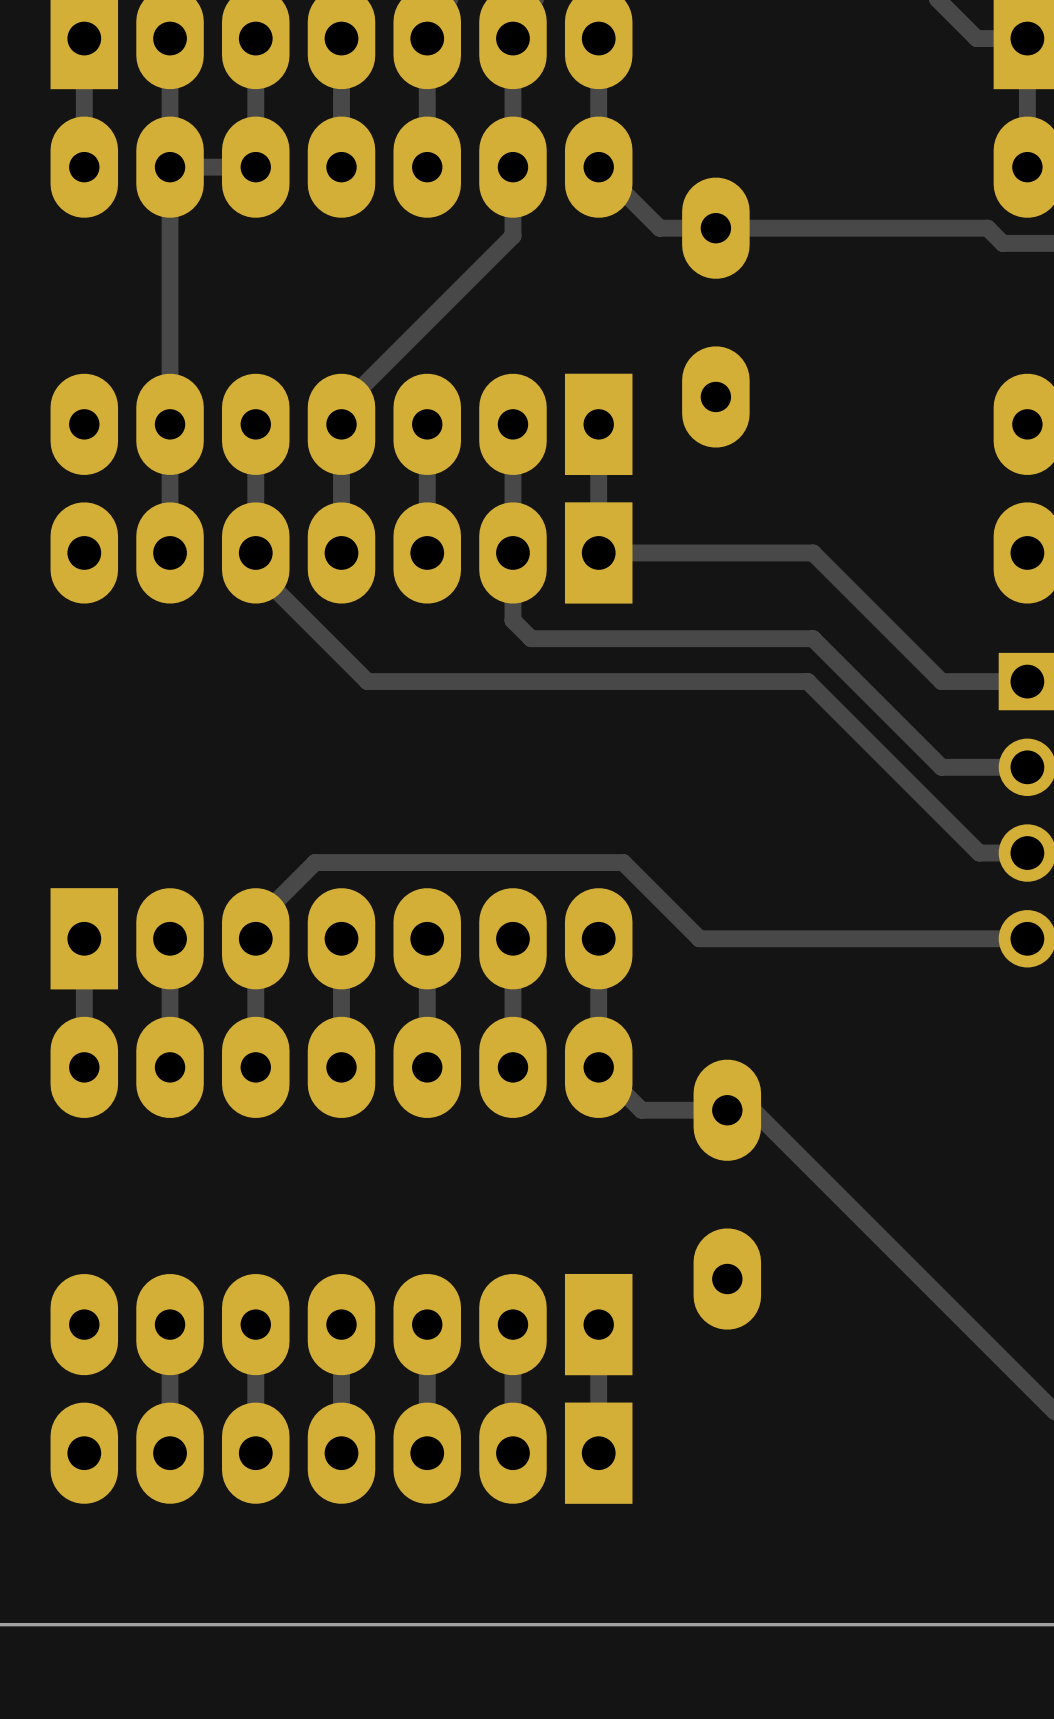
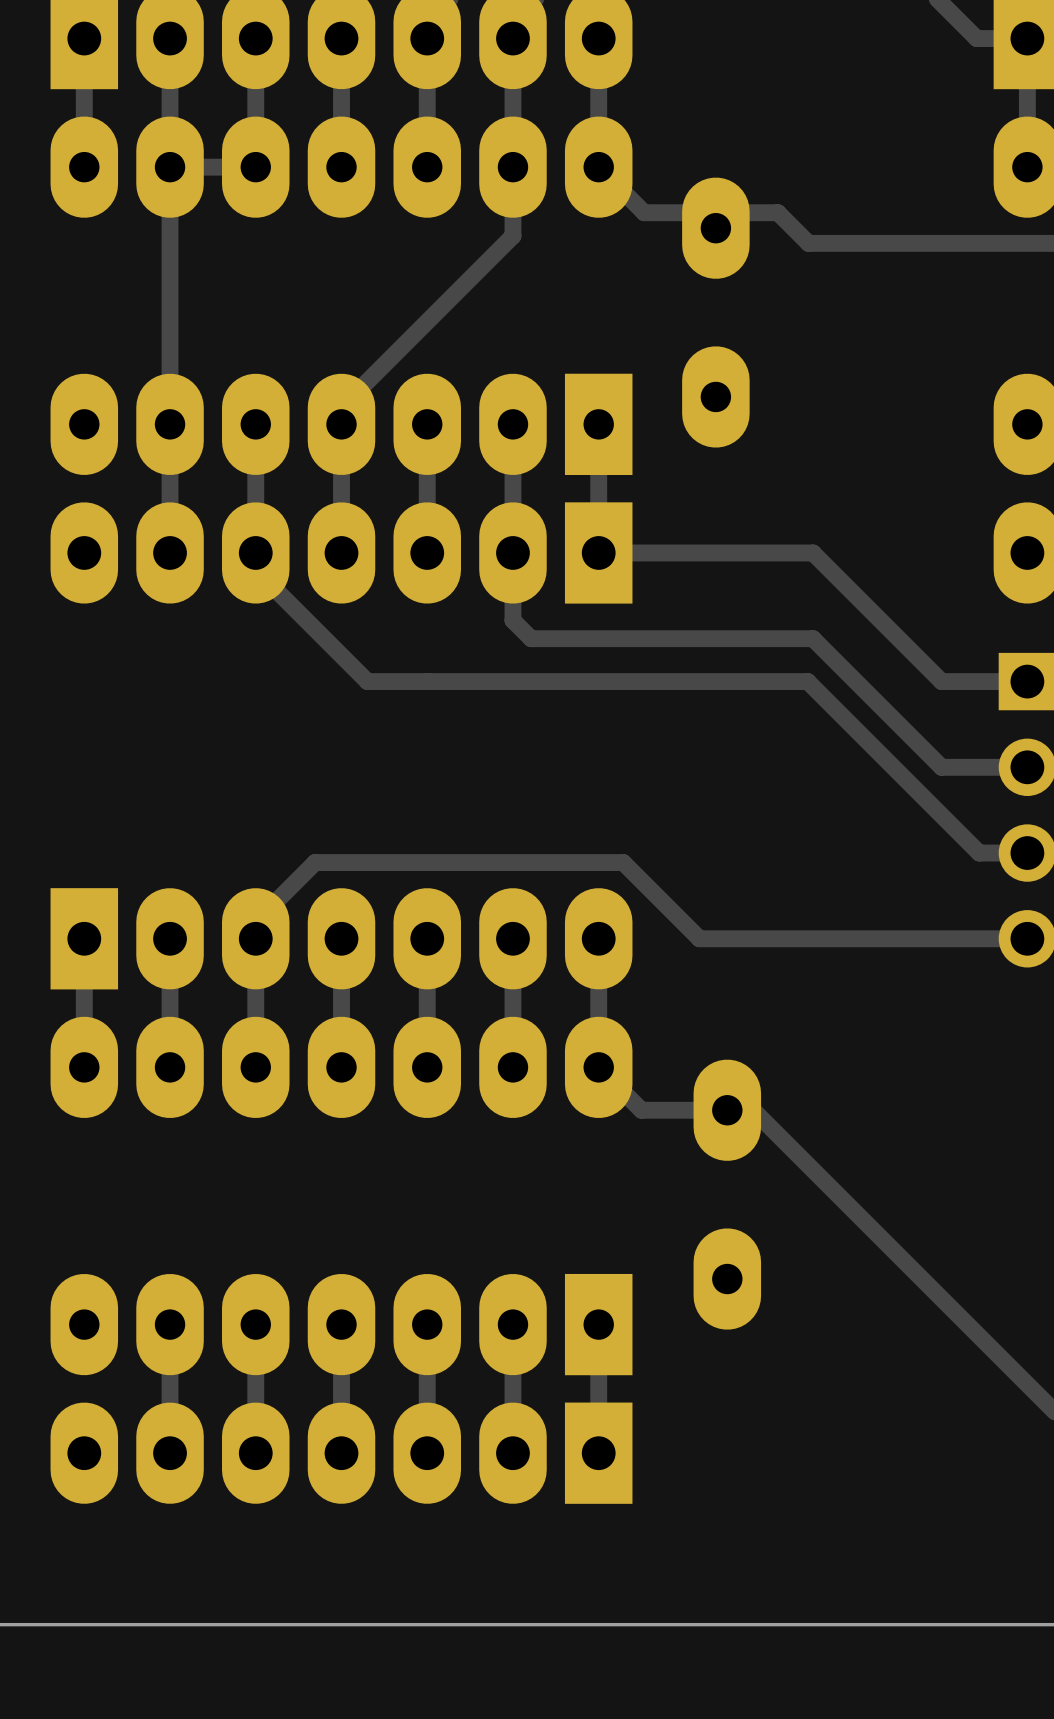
track: (644, 212) (659, 228) (987, 228) (1002, 243) -> (644, 212) (777, 212) (808, 243) (1002, 243)

